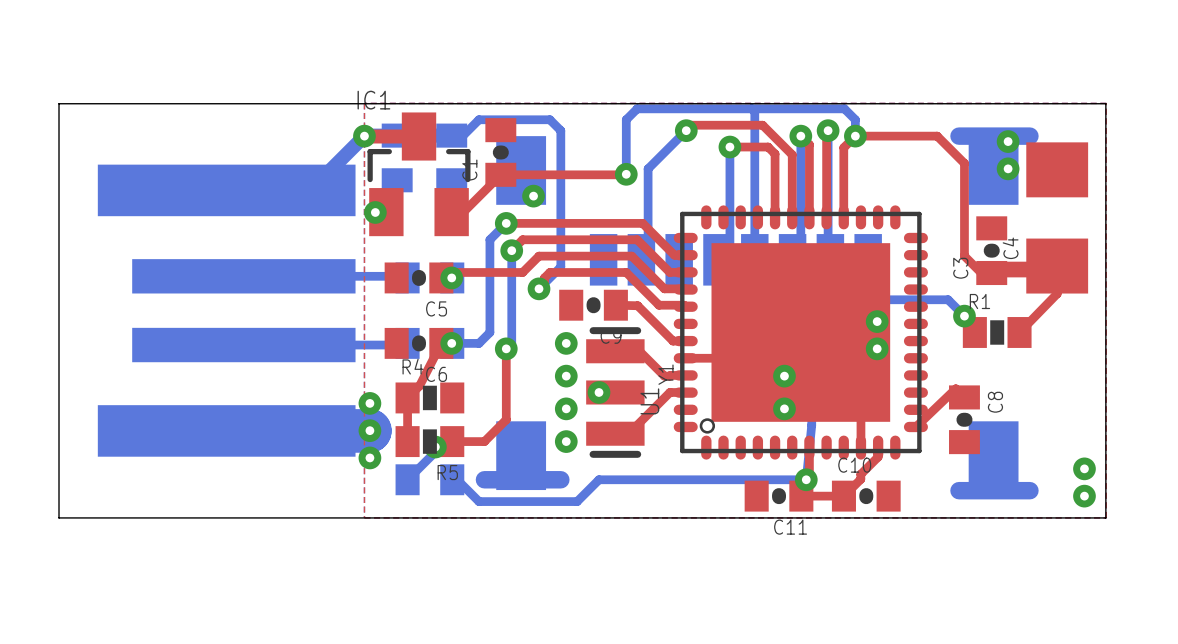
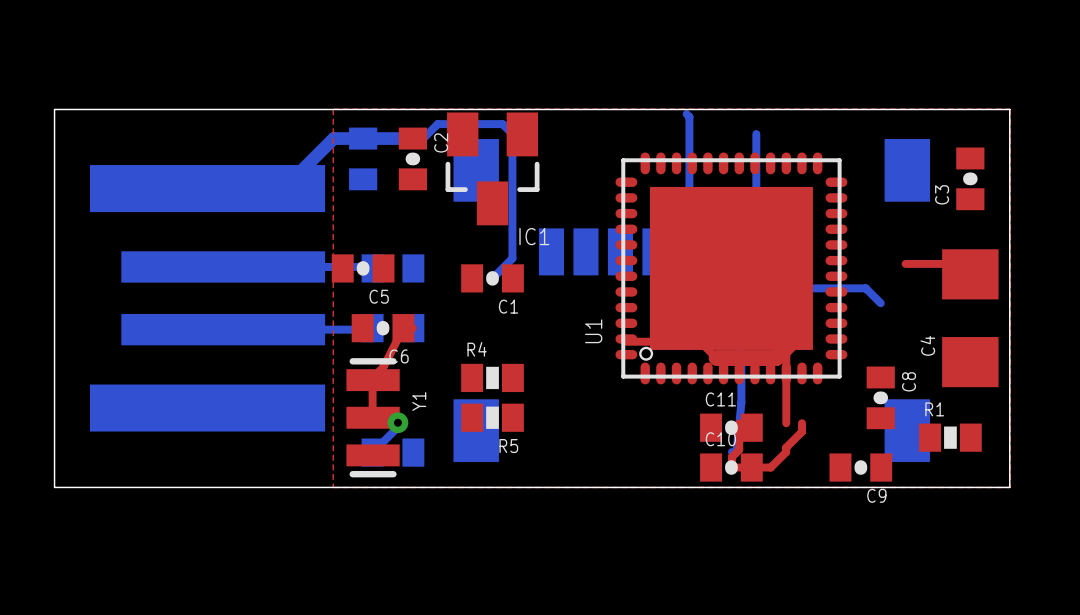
top track: (686, 130) (691, 125) (762, 125) (792, 154) (792, 217) -> none
bottom track: (686, 130) (648, 168) (648, 253) (641, 259) -> none
via: (686, 130) -> none
top track: (828, 130) (826, 217) -> none
via: (828, 130) -> none
top track: (364, 136) (419, 136) -> none
via: (364, 136) -> none
top track: (800, 136) (809, 144) (809, 217) -> none
bottom track: (800, 136) (800, 251) (792, 259) -> none
via: (800, 136) -> none
bottom track: (855, 136) (855, 119) (844, 108) (637, 108) (626, 119) (626, 174) -> none
via: (855, 136) -> none
bottom track: (959, 136) (1029, 136) (1013, 136) (1008, 141) -> none
via: (1008, 141) -> none
top track: (729, 147) (768, 147) (775, 153) (775, 217) -> none
bottom track: (729, 147) (729, 246) (716, 259) -> none
via: (729, 147) -> none
C1 rotation: 0° (500, 152) -> 90° clockwise (492, 278)
C1 position: (500, 152) -> (492, 278)
C2 side: bottom (451, 157) -> top (412, 158)
via: (1008, 168) -> none
IC1 rotation: 0° (419, 174) -> 180° (492, 168)
IC1 position: (419, 174) -> (492, 168)
top track: (626, 174) (500, 174) (463, 212) (451, 212) -> none
via: (626, 174) -> none
via: (533, 196) -> none
via: (375, 212) -> none
top track: (843, 217) (843, 147) (855, 136) (937, 136) (964, 163) (964, 256) (980, 272) (987, 266) (1057, 266) (1057, 293) (1019, 332) -> none
C4 position: (1057, 217) -> (970, 318)
top track: (506, 223) (642, 223) (674, 255) (685, 255) -> none
bottom track: (506, 223) (489, 239) (489, 332) (479, 343) (451, 343) -> none
via: (506, 223) -> none
top track: (511, 250) (522, 239) (637, 239) (669, 272) (685, 272) -> none
bottom track: (511, 250) (511, 343) (506, 348) -> none
via: (511, 250) -> none
C3 position: (991, 250) -> (970, 178)
C5 position: (419, 277) -> (363, 268)
top track: (451, 277) (457, 272) (522, 272) (539, 256) (631, 256) (664, 288) (685, 289) -> none
via: (451, 277) -> none
top track: (539, 288) (544, 283) (544, 277) (549, 272) (626, 272) (659, 305) (685, 306) -> none
via: (539, 288) -> none
C9 position: (593, 305) -> (860, 467)
top track: (615, 305) (637, 305) (673, 341) (685, 341) -> none
via: (964, 316) -> none
via: (877, 321) -> none
U1 position: (800, 332) -> (731, 268)
R1 position: (997, 332) -> (950, 437)
via: (451, 343) -> none
via: (566, 343) -> none
top track: (506, 348) (506, 419) (484, 441) (439, 442) (435, 447) -> none
via: (506, 348) -> none
via: (877, 348) -> none
top track: (615, 351) (617, 348) (637, 348) (664, 376) (685, 375) -> none
via: (566, 376) -> none
via: (784, 376) -> none
via: (599, 392) -> none
Y1 position: (615, 392) -> (373, 417)
top track: (685, 392) (669, 392) (628, 433) (615, 433) -> none
R4 position: (429, 397) -> (492, 377)
top track: (964, 397) (955, 388) (915, 426) -> none
via: (369, 403) -> none
via: (566, 408) -> none
via: (784, 408) -> none
via: (369, 430) -> none
R5 position: (429, 441) -> (492, 417)
via: (566, 441) -> none
via: (369, 457) -> none
via: (1084, 468) -> none
bottom track: (452, 479) (457, 479) (479, 501) (577, 501) (599, 479) (801, 479) -> none
bottom track: (484, 479) (560, 479) -> none
via: (806, 479) -> none
bottom track: (959, 490) (1029, 490) -> none
C11 position: (779, 496) -> (731, 427)
C10 position: (866, 496) -> (731, 467)
via: (1084, 496) -> none
C11 name position: C11 (790, 527) -> C11 (720, 399)

